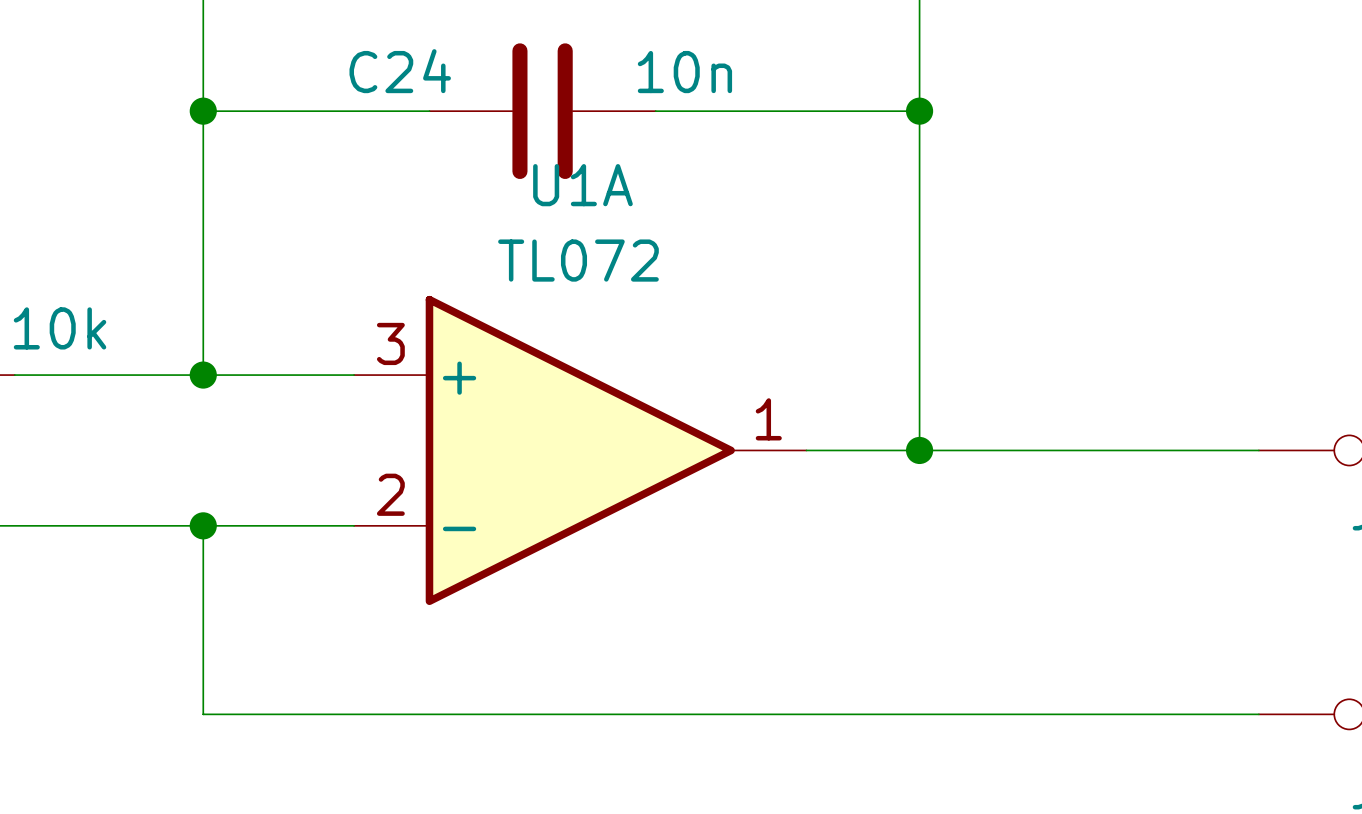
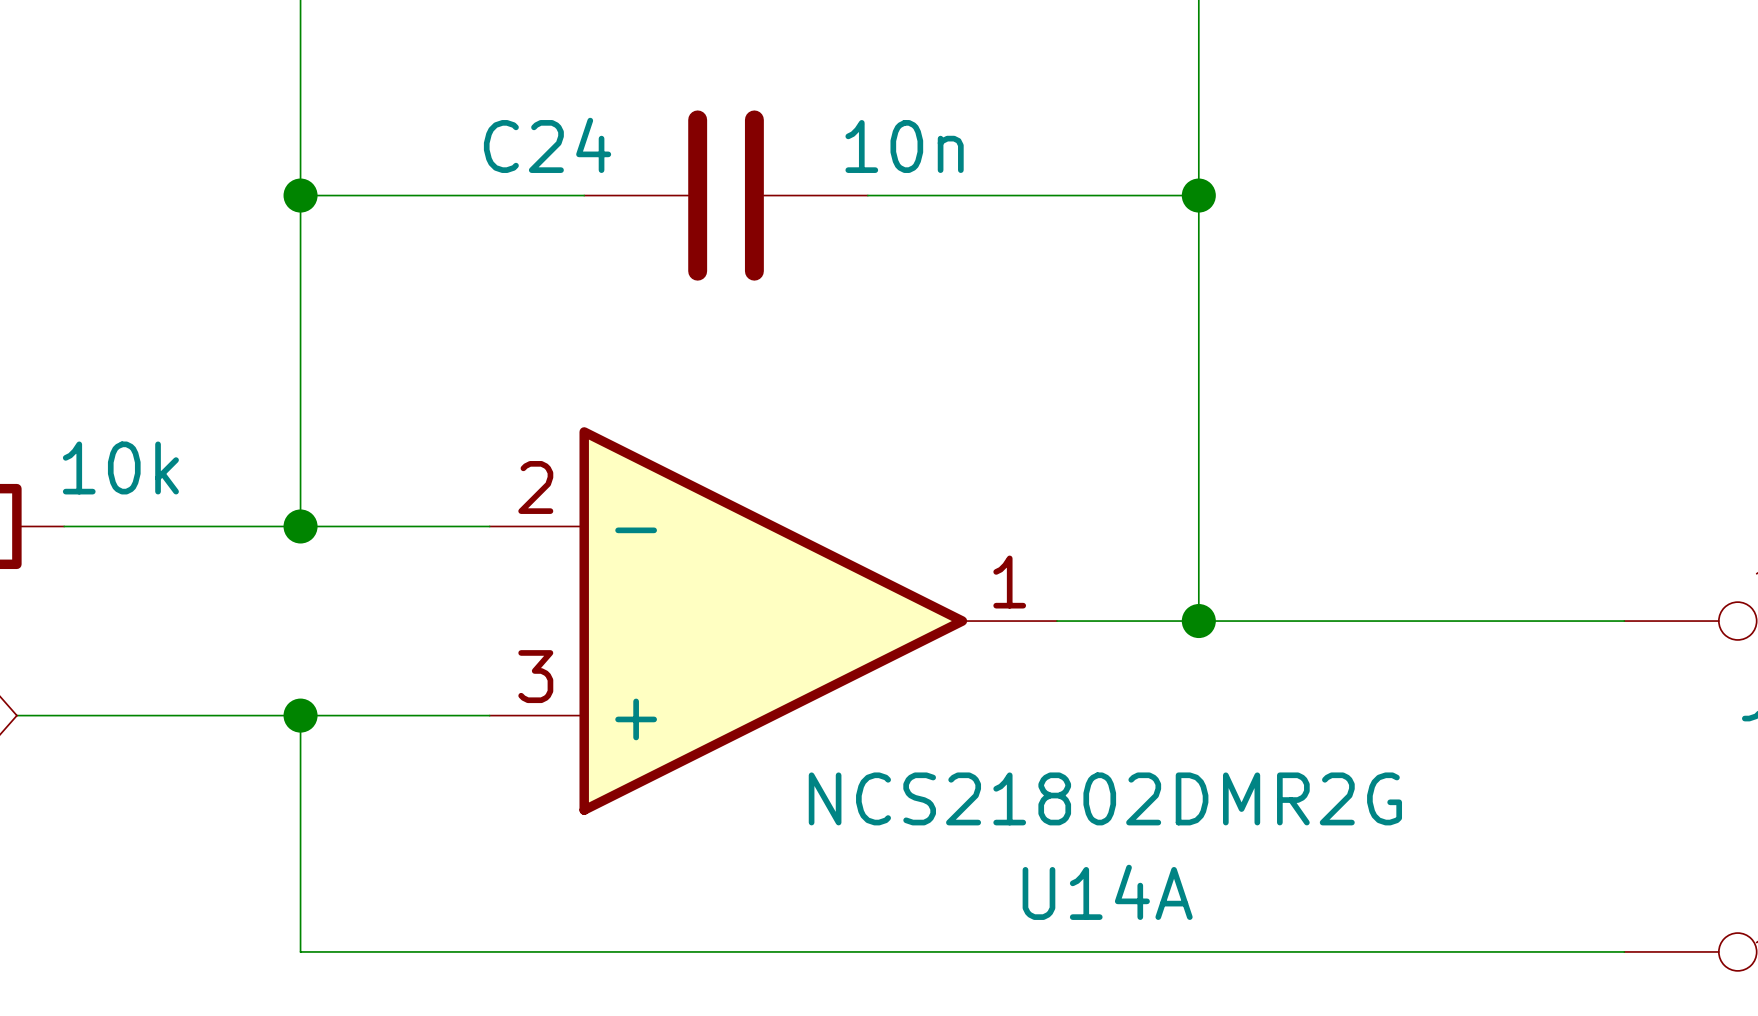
U1A name: U1A (582, 185) -> U14A (1107, 892)
U1A value: TL072 (578, 260) -> NCS21802DMR2G (1105, 798)
U1A flip: as is (580, 450) -> up-down (773, 621)

